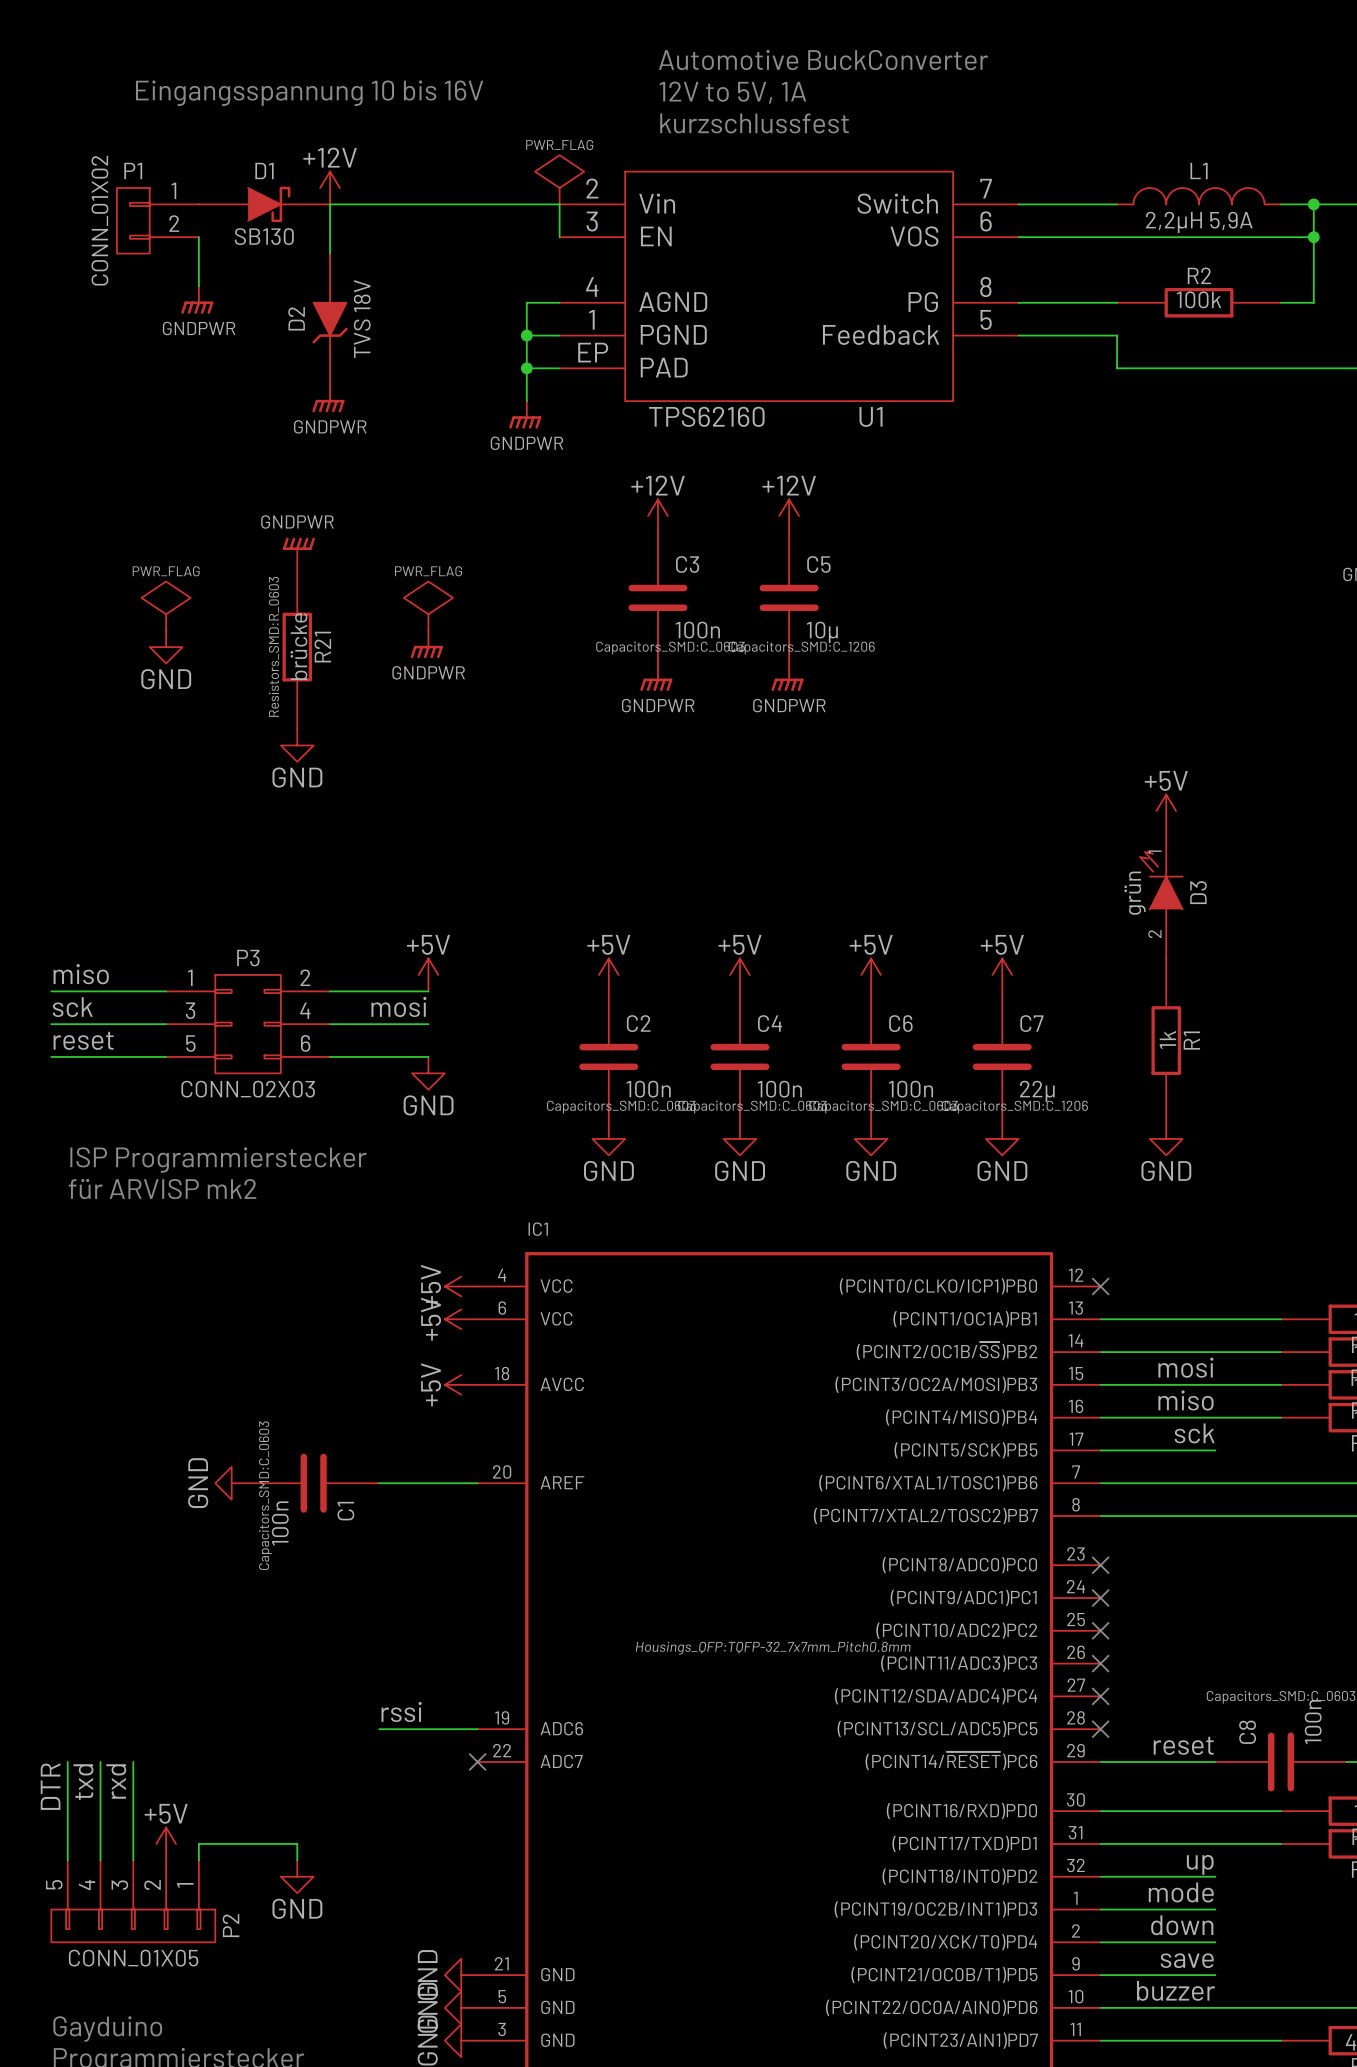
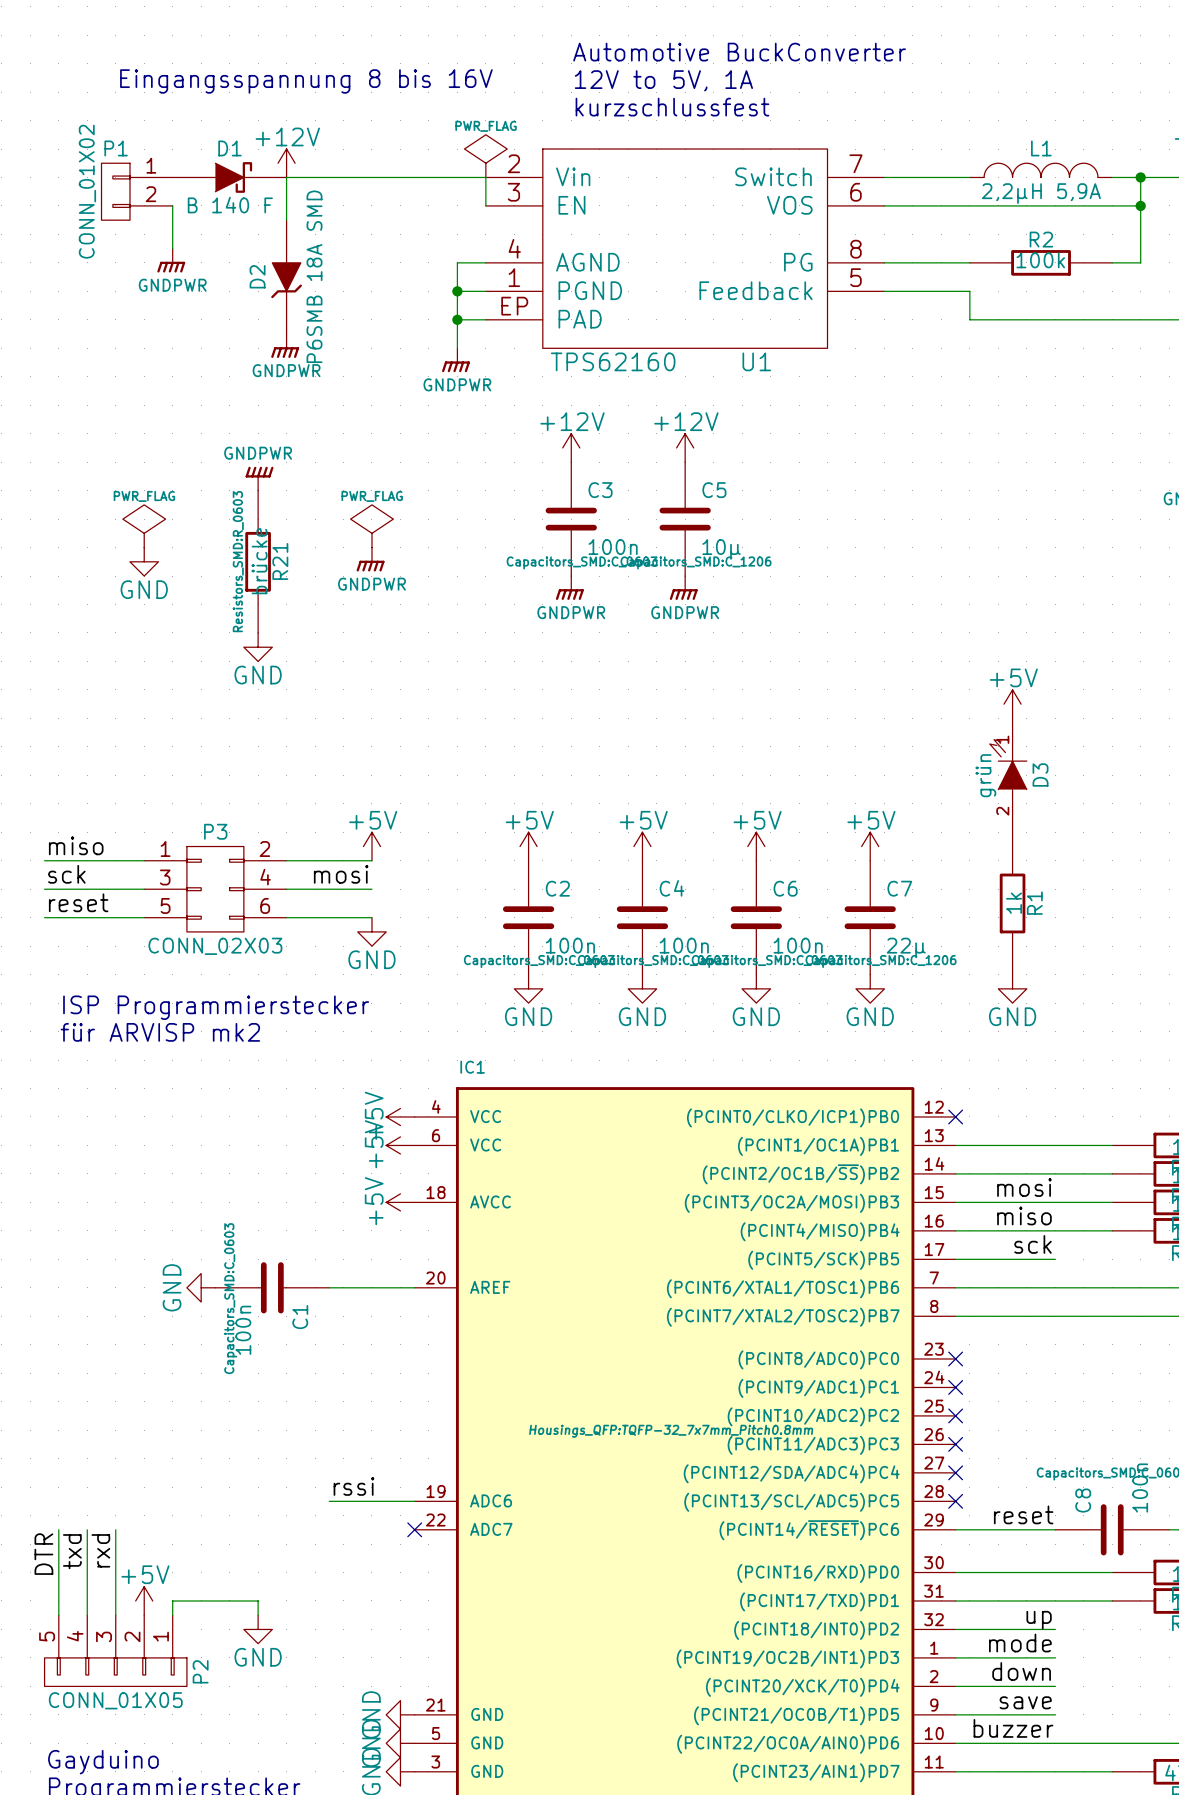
text: Eingangsspannung 10 bis 16V (309, 93) -> Eingangsspannung 8 bis 16V (306, 81)
D1 value: SB130 (264, 236) -> B 140 F (230, 205)
D2 value: TVS 18V (362, 319) -> P6SMB 18A SMD (314, 276)

